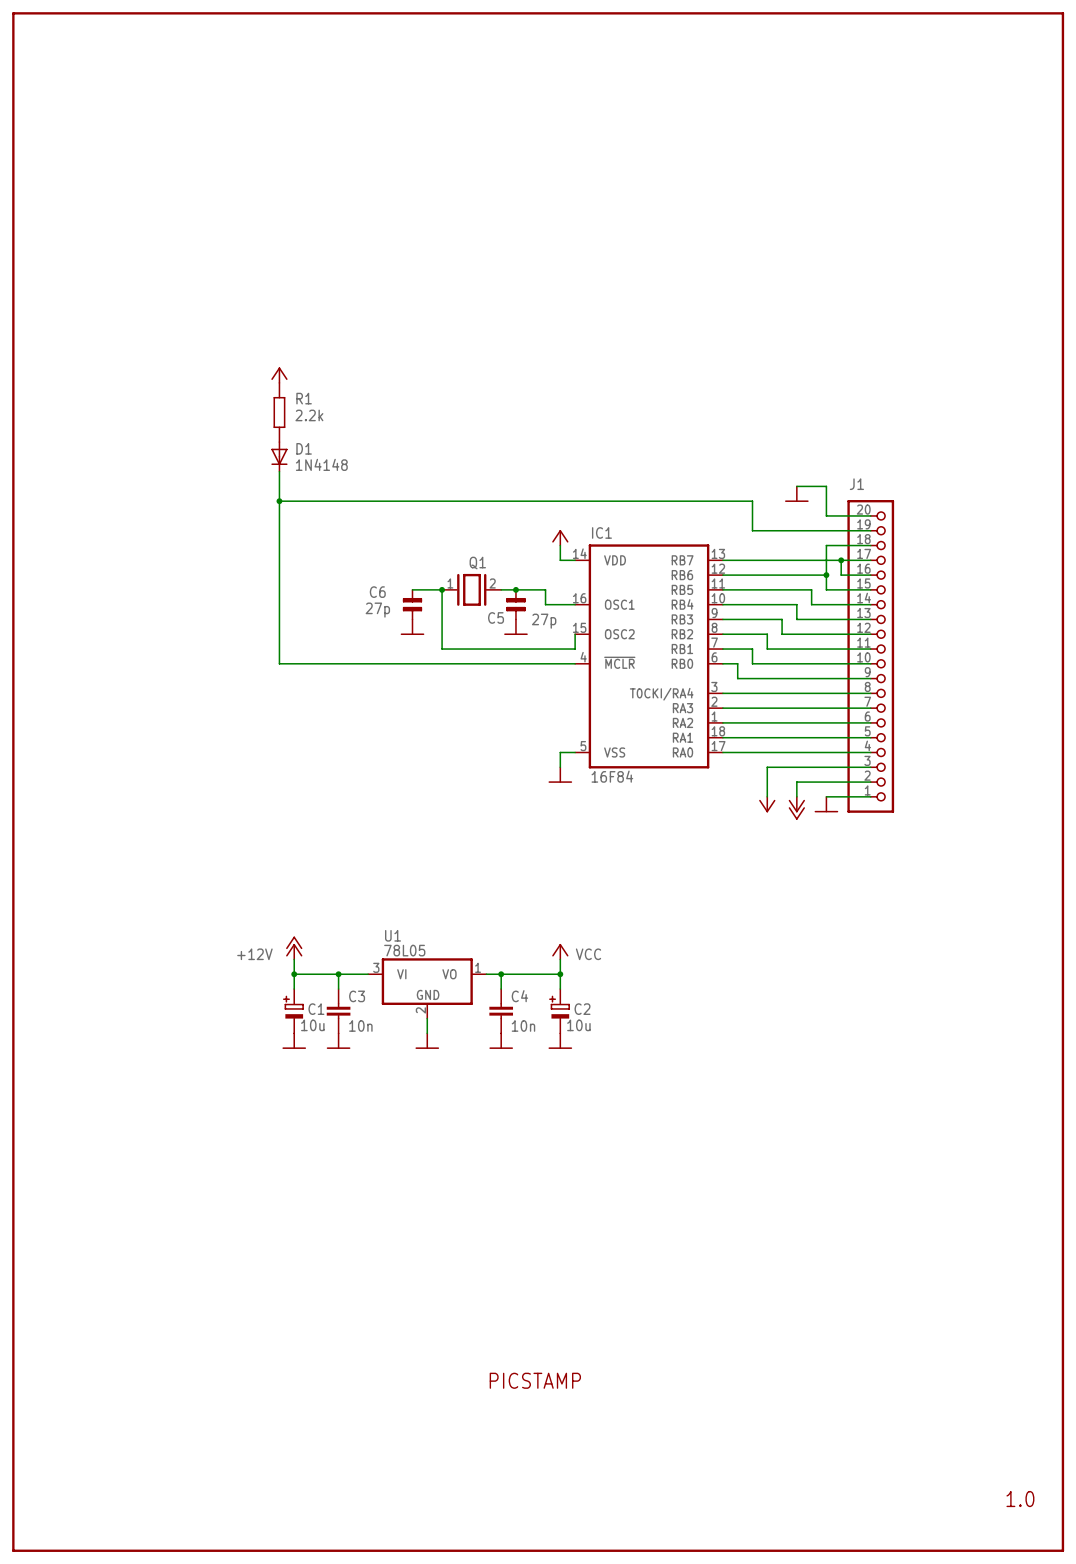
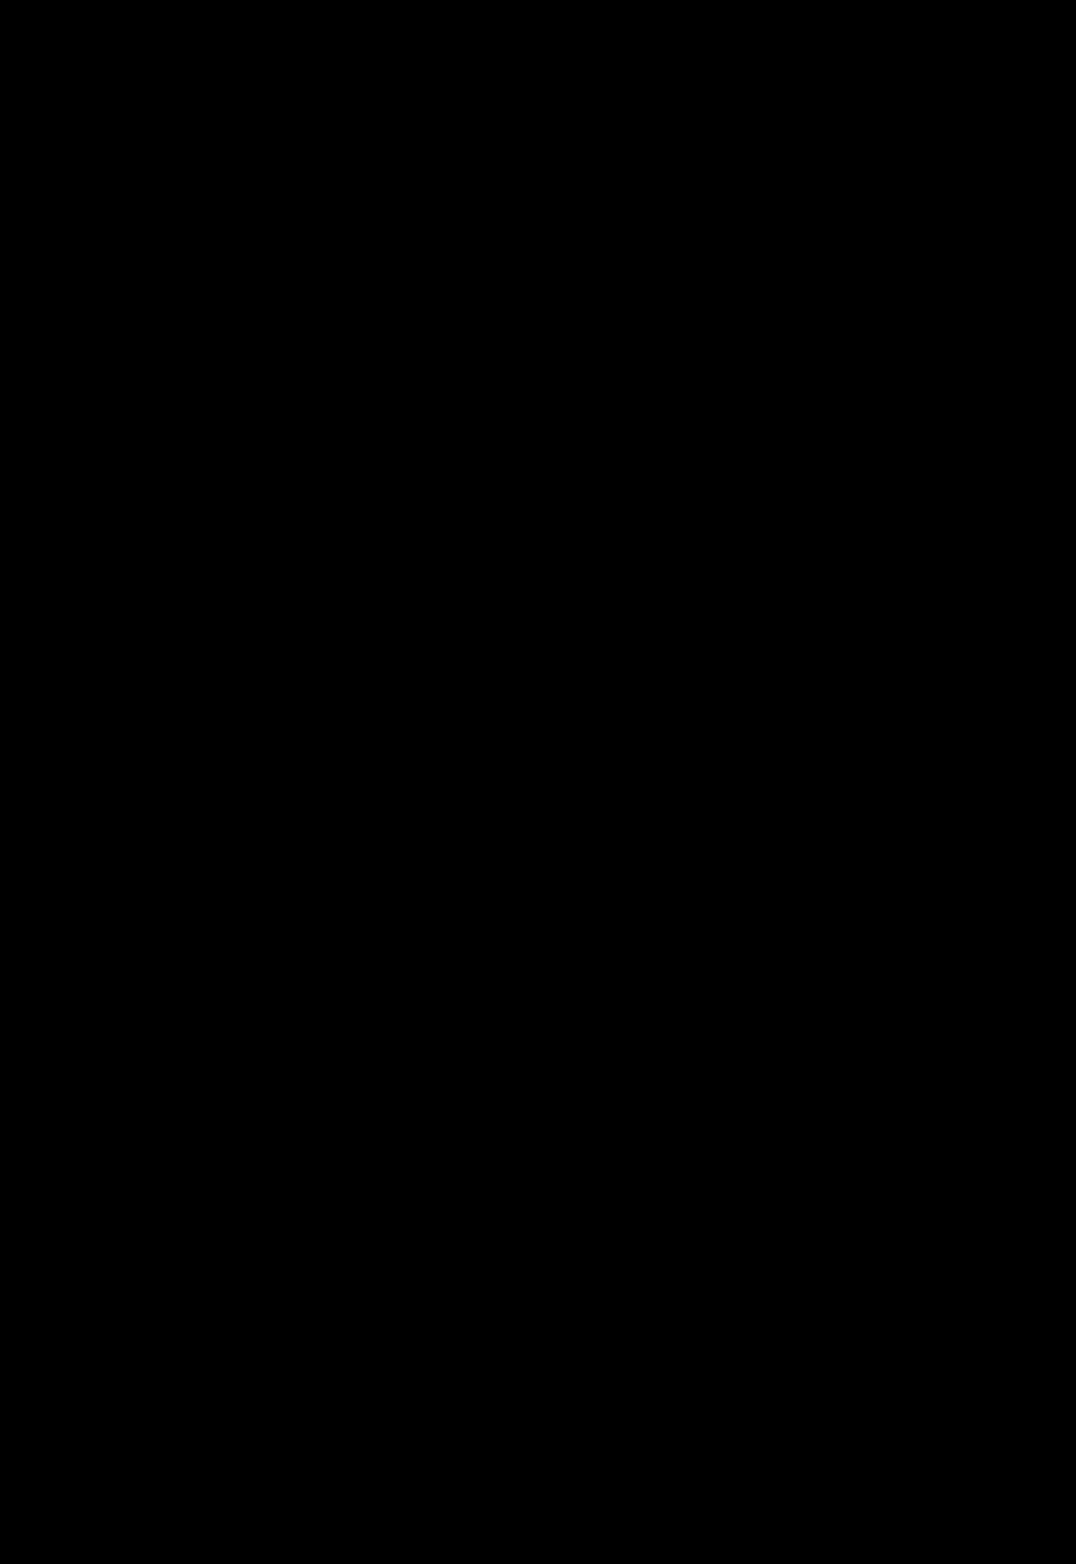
power symbol: (279, 375) -> none
R1: 2.2k (279, 412) -> none
D1: 1N4148 (279, 456) -> none
wire: (279, 471) (279, 663) (575, 663) -> none
wire: (796, 486) (826, 486) (826, 515) (870, 515) -> none
power symbol: (796, 494) -> none
wire: (279, 501) (752, 501) (752, 530) (870, 530) -> none
junction: (279, 501) -> none
power symbol: (560, 537) -> none
wire: (560, 545) (560, 560) (575, 560) -> none
wire: (870, 545) (826, 545) (826, 589) (870, 589) -> none
wire: (722, 560) (870, 560) -> none
wire: (841, 560) (841, 575) (870, 575) -> none
junction: (841, 560) -> none
wire: (722, 575) (826, 575) -> none
junction: (826, 575) -> none
wire: (412, 589) (442, 589) (442, 649) (575, 649) (575, 634) -> none
junction: (442, 589) -> none
Q1: (471, 589) -> none
wire: (501, 589) (545, 589) (545, 604) (575, 604) -> none
junction: (515, 589) -> none
wire: (722, 589) (811, 589) (811, 604) (870, 604) -> none
C6: 27p (412, 604) -> none
C5: 27p (515, 604) -> none
wire: (722, 604) (796, 604) (796, 619) (870, 619) -> none
wire: (722, 619) (782, 619) (782, 634) (870, 634) -> none
power symbol: (412, 627) -> none
power symbol: (515, 627) -> none
wire: (722, 634) (767, 634) (767, 649) (870, 649) -> none
wire: (722, 649) (752, 649) (752, 663) (870, 663) -> none
IC1: 16F84 (649, 656) -> none
J1: (870, 656) -> none
wire: (722, 663) (737, 663) (737, 678) (870, 678) -> none
wire: (722, 693) (870, 693) -> none
wire: (722, 708) (870, 708) -> none
wire: (722, 722) (870, 722) -> none
wire: (722, 737) (870, 737) -> none
wire: (575, 752) (560, 752) (560, 767) -> none
wire: (722, 752) (870, 752) -> none
wire: (870, 767) (767, 767) (767, 796) -> none
power symbol: (560, 775) -> none
part: (538, 782) -> none
wire: (870, 782) (796, 782) (796, 796) -> none
wire: (826, 796) (870, 796) -> none
power symbol: (767, 804) -> none
power symbol: (826, 804) -> none
power symbol: (796, 808) -> none
power symbol: (294, 948) -> none
power symbol: (560, 951) -> none
label: +12V (254, 954) -> none
label: VCC (588, 954) -> none
wire: (294, 959) (294, 989) -> none
wire: (560, 959) (560, 989) -> none
wire: (294, 974) (368, 974) -> none
junction: (294, 974) -> none
wire: (338, 974) (338, 989) -> none
junction: (338, 974) -> none
wire: (486, 974) (560, 974) -> none
wire: (501, 974) (501, 989) -> none
junction: (501, 974) -> none
junction: (560, 974) -> none
U1: 78L05 (427, 988) -> none
C1: 10u (293, 1011) -> none
C3: 10n (338, 1011) -> none
C4: 10n (501, 1011) -> none
C2: 10u (559, 1011) -> none
wire: (427, 1018) (427, 1033) -> none
power symbol: (294, 1041) -> none
power symbol: (338, 1041) -> none
power symbol: (427, 1041) -> none
power symbol: (501, 1041) -> none
power symbol: (560, 1041) -> none
text: PICSTAMP (535, 1380) -> none
text: 1.0 (1020, 1499) -> none

